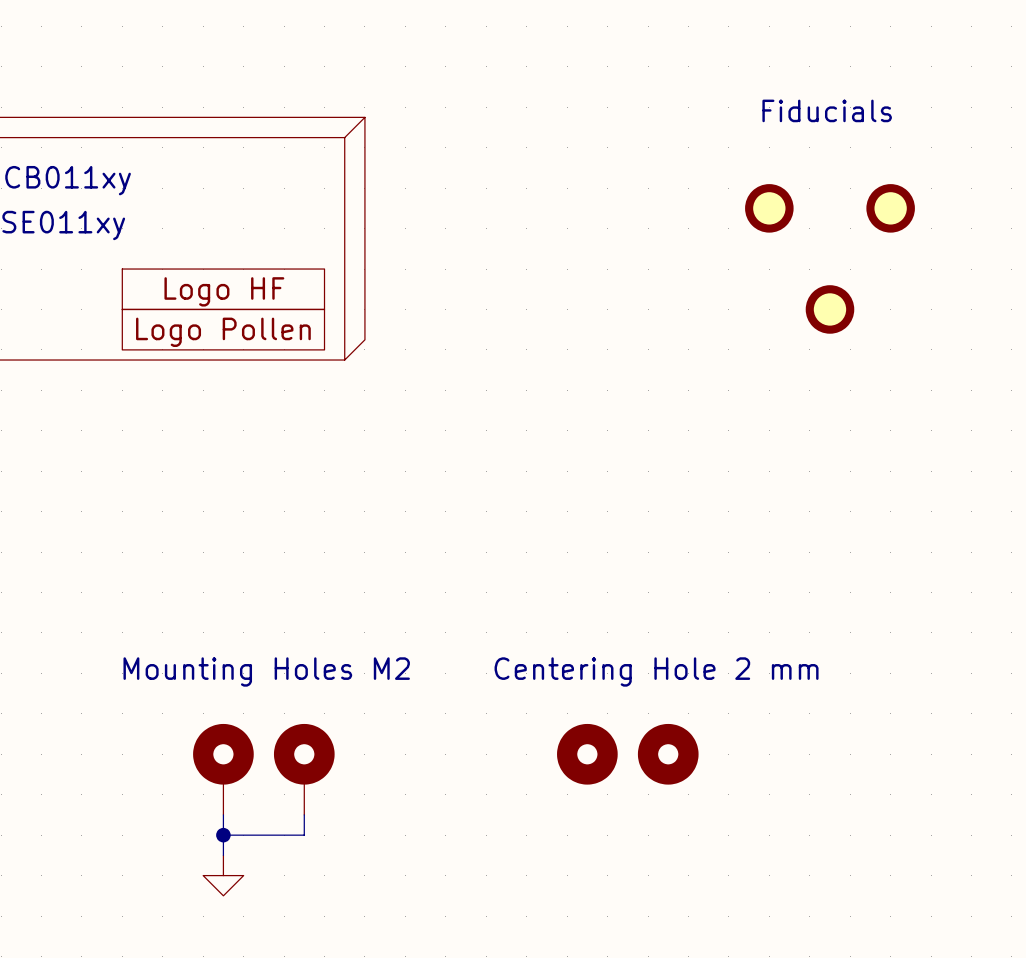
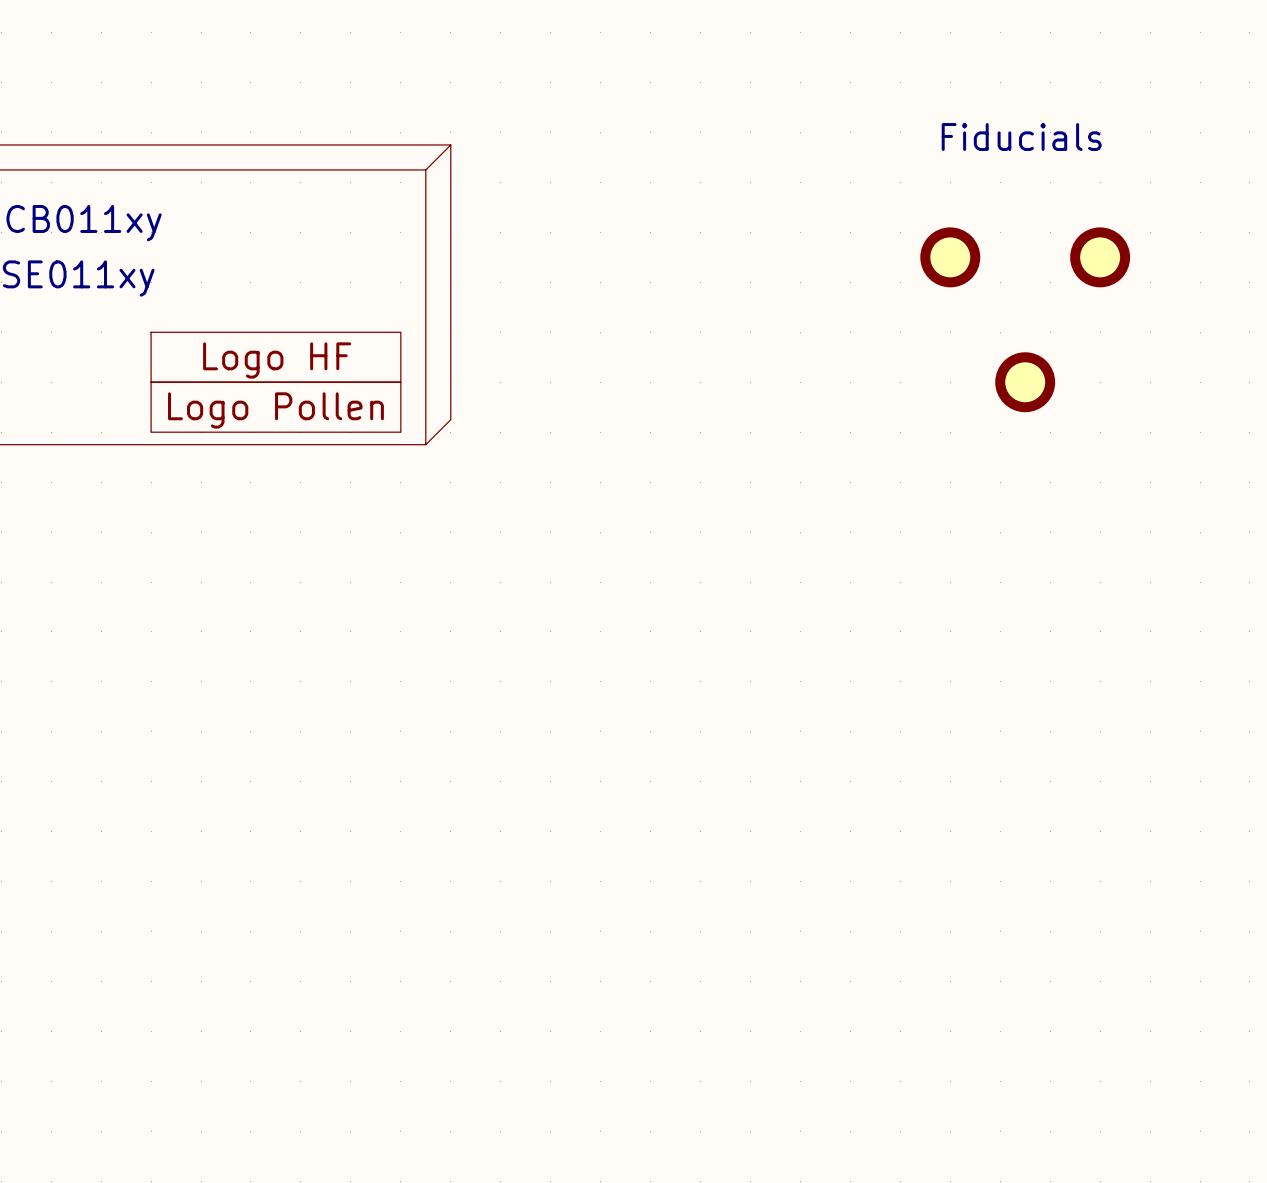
part: Centering Hole 2 mm (587, 754) -> none
part: (668, 754) -> none
part: Mounting Holes M2 (223, 769) -> none
part: (304, 769) -> none
wire: (223, 814) (223, 855) -> none
wire: (304, 814) (304, 835) (223, 835) -> none
junction: (223, 835) -> none
power symbol: (223, 875) -> none

